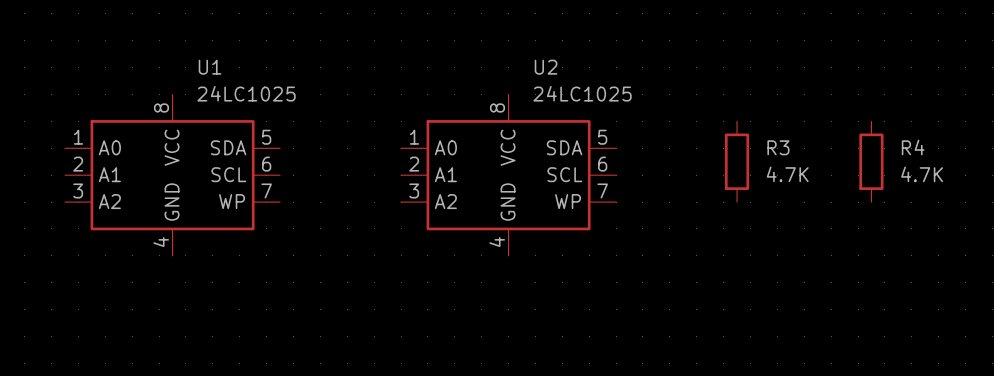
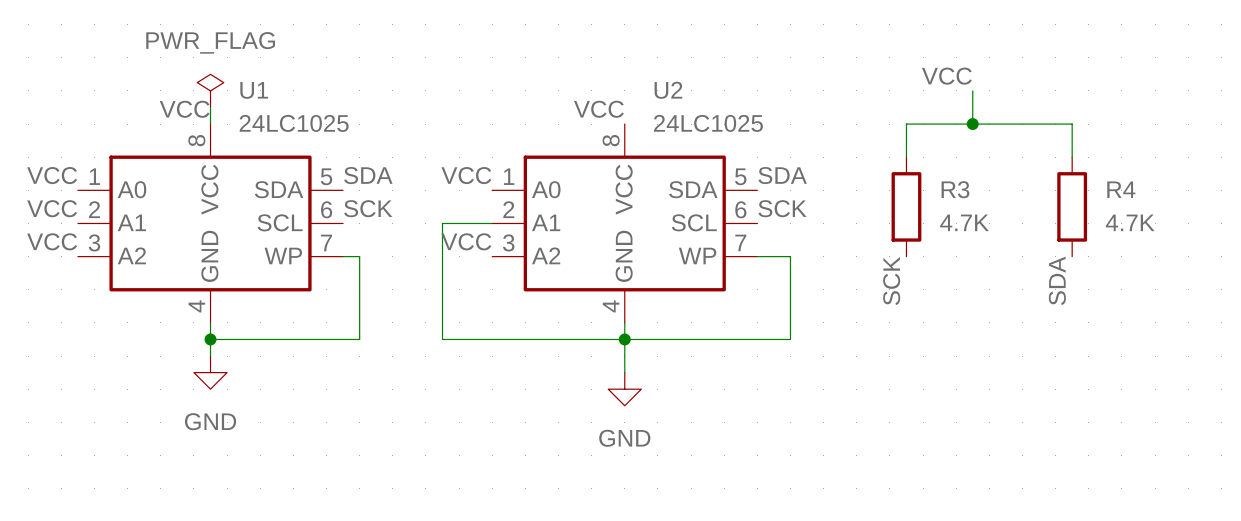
label: none -> VCC (946, 76)
power symbol: none -> PWR_FLAG (210, 90)
wire: none -> (972, 90) (972, 124)
wire: none -> (210, 107) (210, 124)
label: none -> VCC (184, 109)
label: none -> VCC (598, 109)
junction: none -> (972, 124)
wire: none -> (906, 157) (906, 124) (1072, 124) (1072, 157)
label: none -> VCC (52, 175)
label: none -> SDA (368, 175)
label: none -> VCC (466, 175)
label: none -> SDA (782, 175)
label: none -> VCC (52, 208)
label: none -> SCK (368, 208)
label: none -> SCK (782, 208)
wire: none -> (492, 223) (442, 223) (442, 339) (790, 339) (790, 256) (757, 256)
label: none -> VCC (52, 241)
label: none -> VCC (466, 241)
wire: none -> (343, 256) (359, 256) (359, 339) (210, 339)
label: none -> SDA (1057, 280)
label: none -> SCK (891, 280)
wire: none -> (210, 322) (210, 356)
wire: none -> (624, 322) (624, 372)
junction: none -> (210, 339)
junction: none -> (624, 339)
power symbol: none -> GND (210, 372)
power symbol: none -> GND (624, 389)

